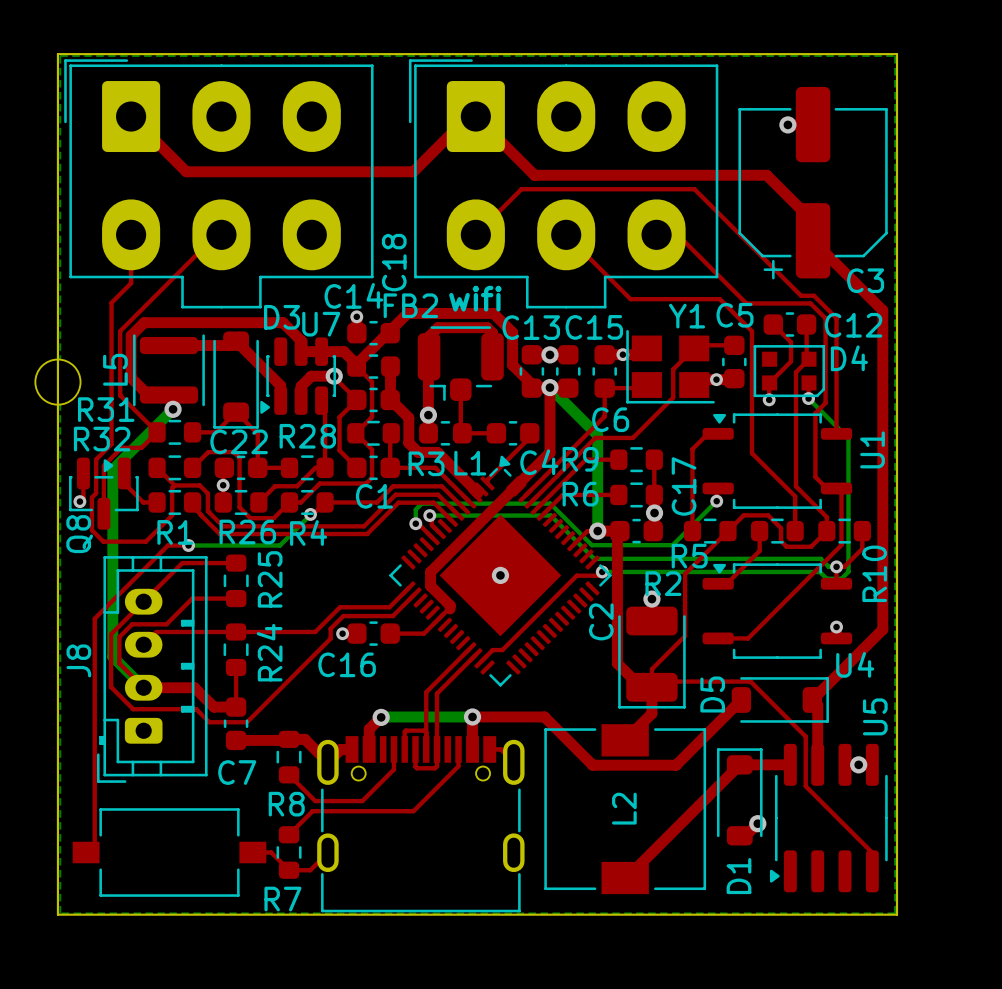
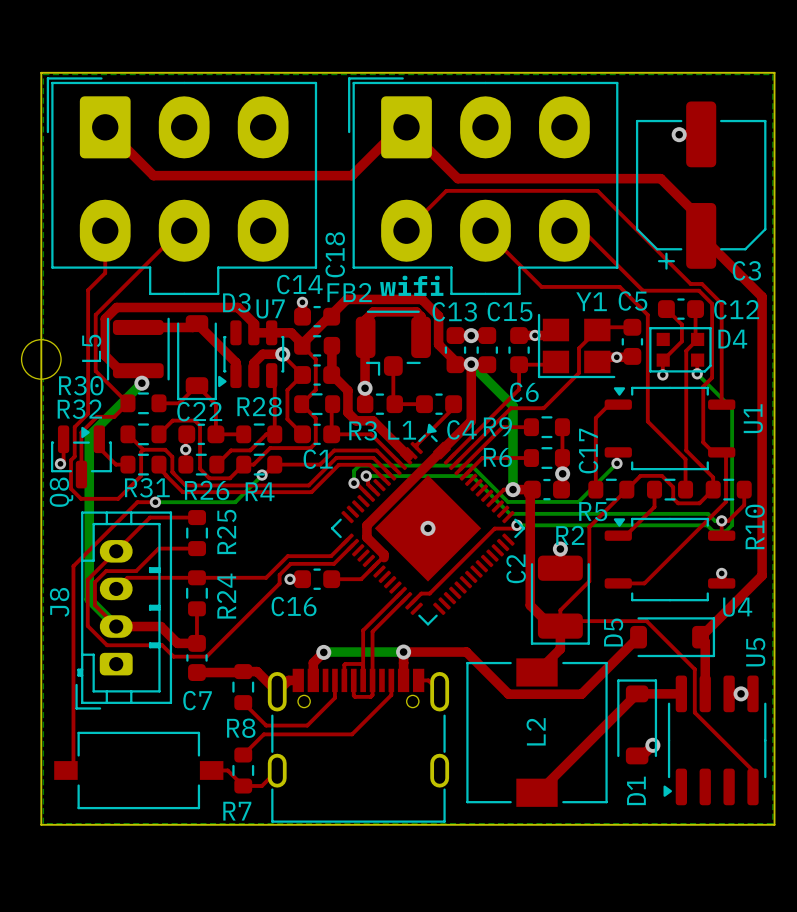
R31 name: R31 (106, 409) -> R30 (81, 385)
R1 name: R1 (175, 532) -> R31 (147, 487)

